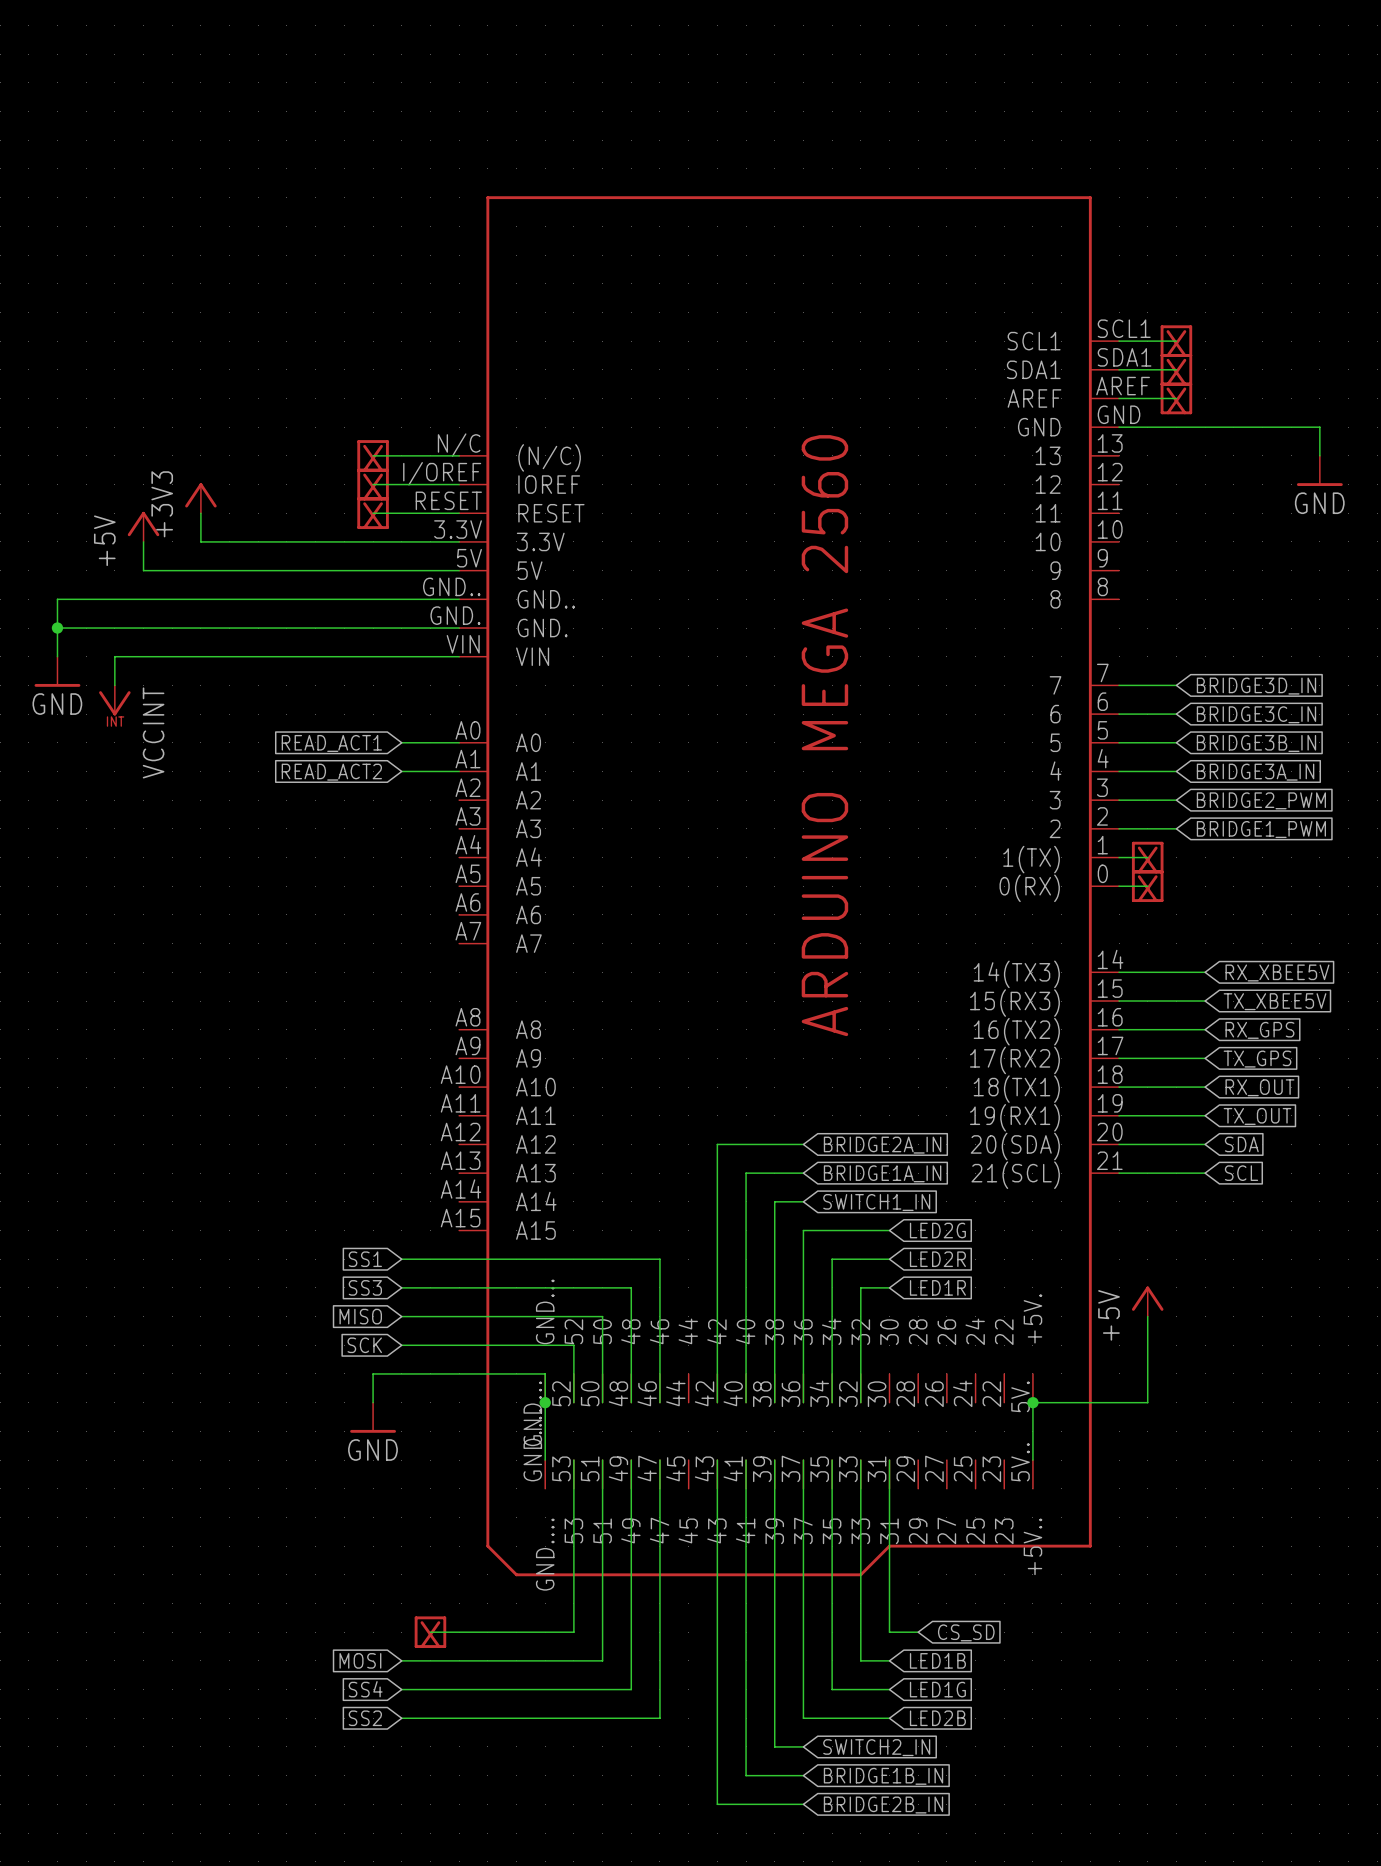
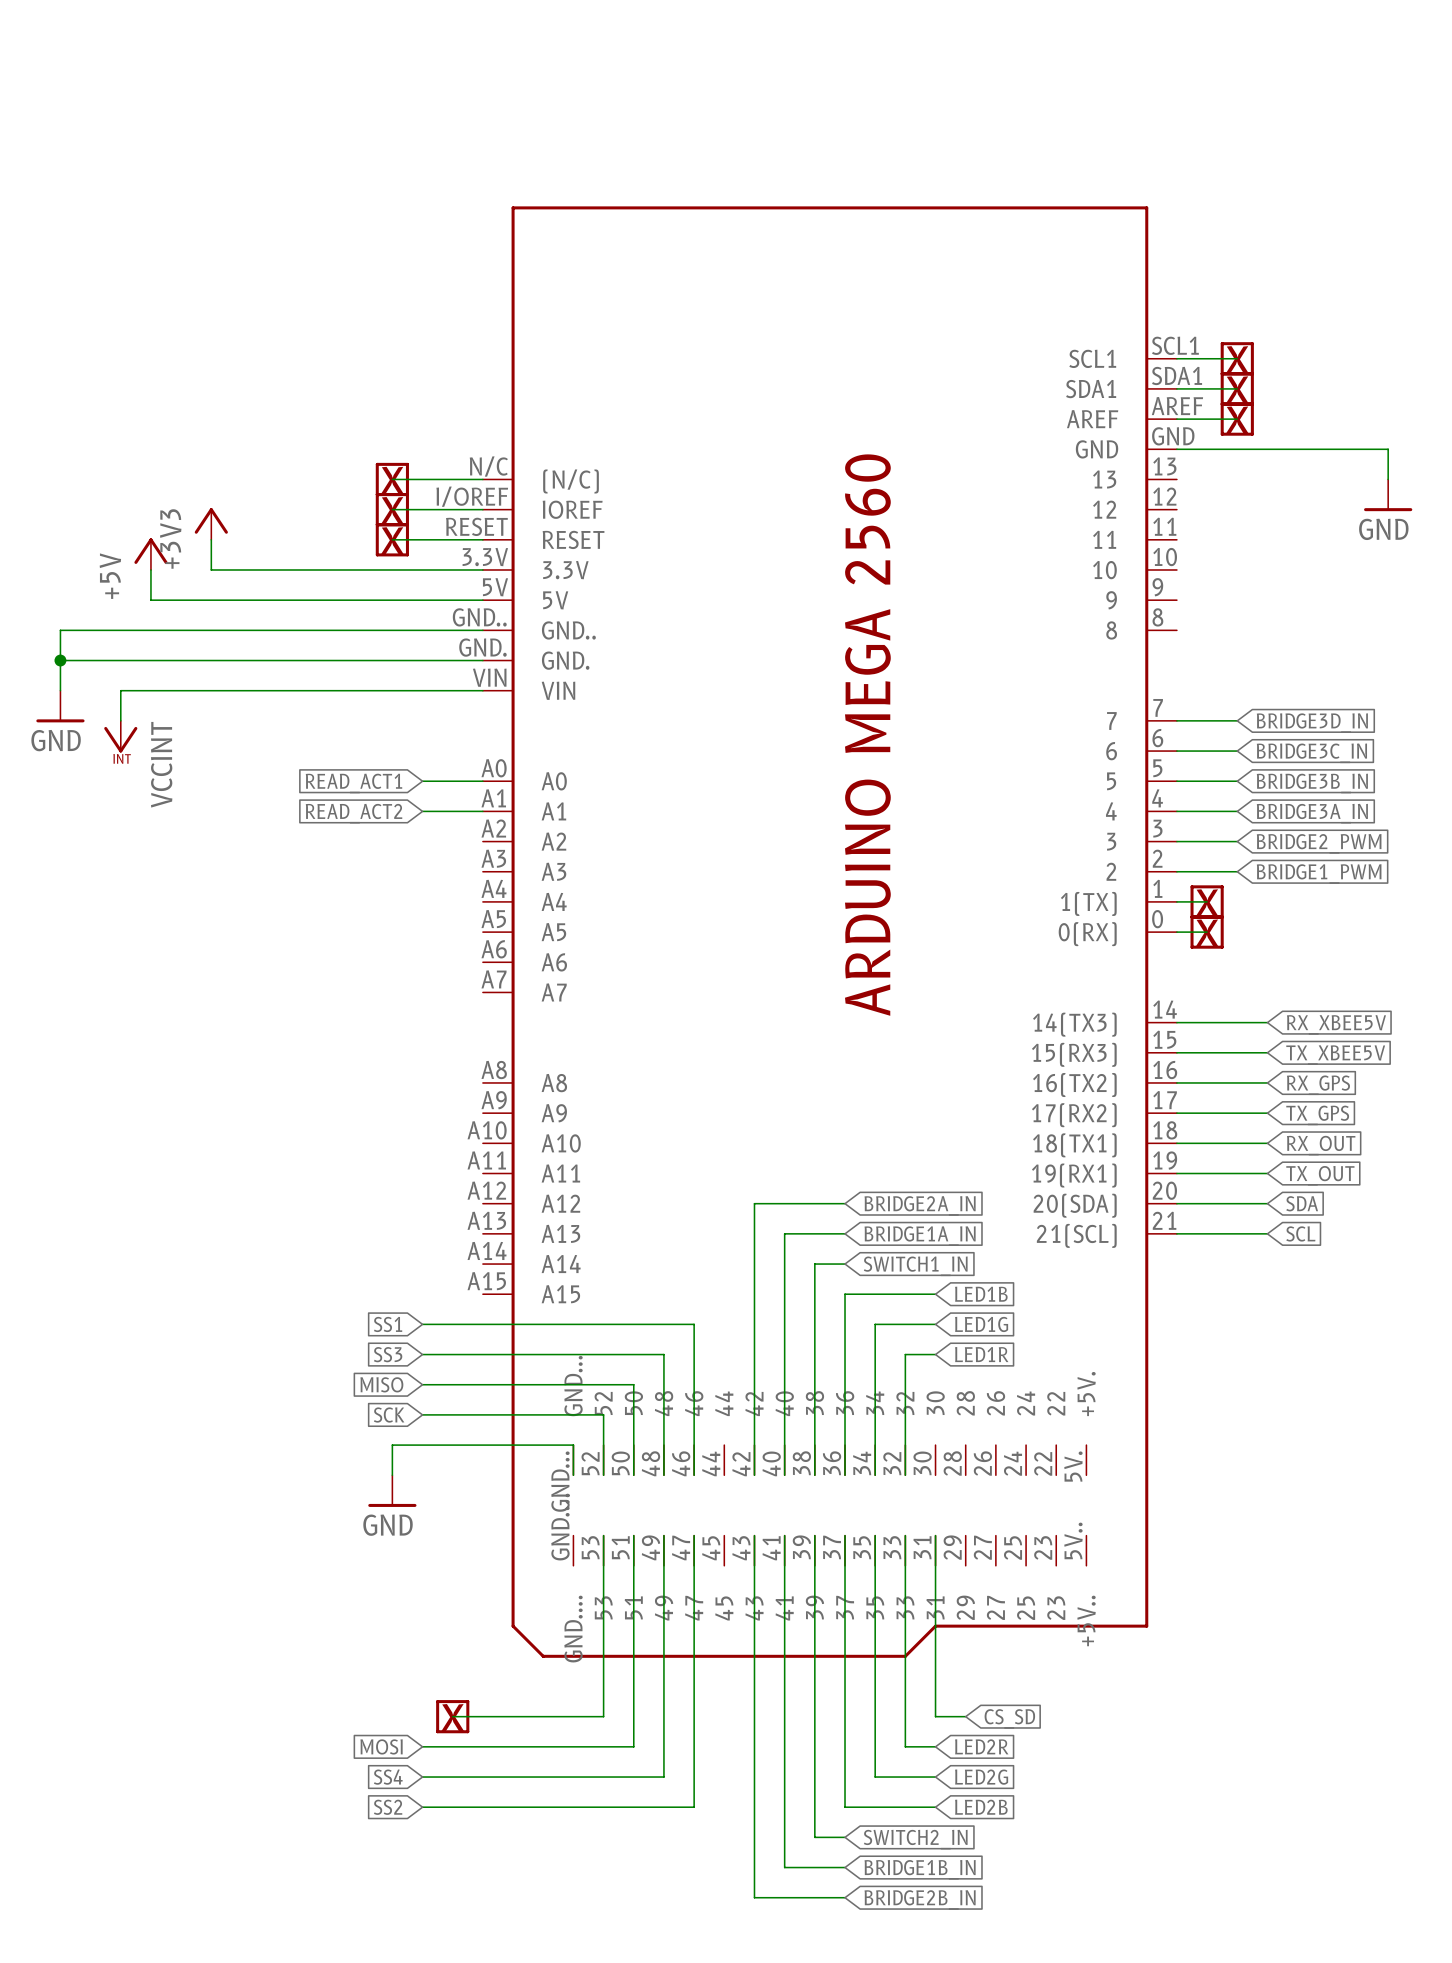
global label: LED2G (937, 1230) -> LED1B (981, 1294)
global label: LED2R (937, 1259) -> LED1G (981, 1324)
power symbol: +5V (1147, 1301) -> none
wire: (1147, 1316) (1147, 1402) (1032, 1402) (1032, 1460) -> none
wire: (545, 1402) (545, 1460) -> none
junction: (545, 1402) -> none
junction: (1032, 1402) -> none
global label: LED1B (937, 1660) -> LED2R (981, 1746)
global label: LED1G (937, 1689) -> LED2G (981, 1777)

